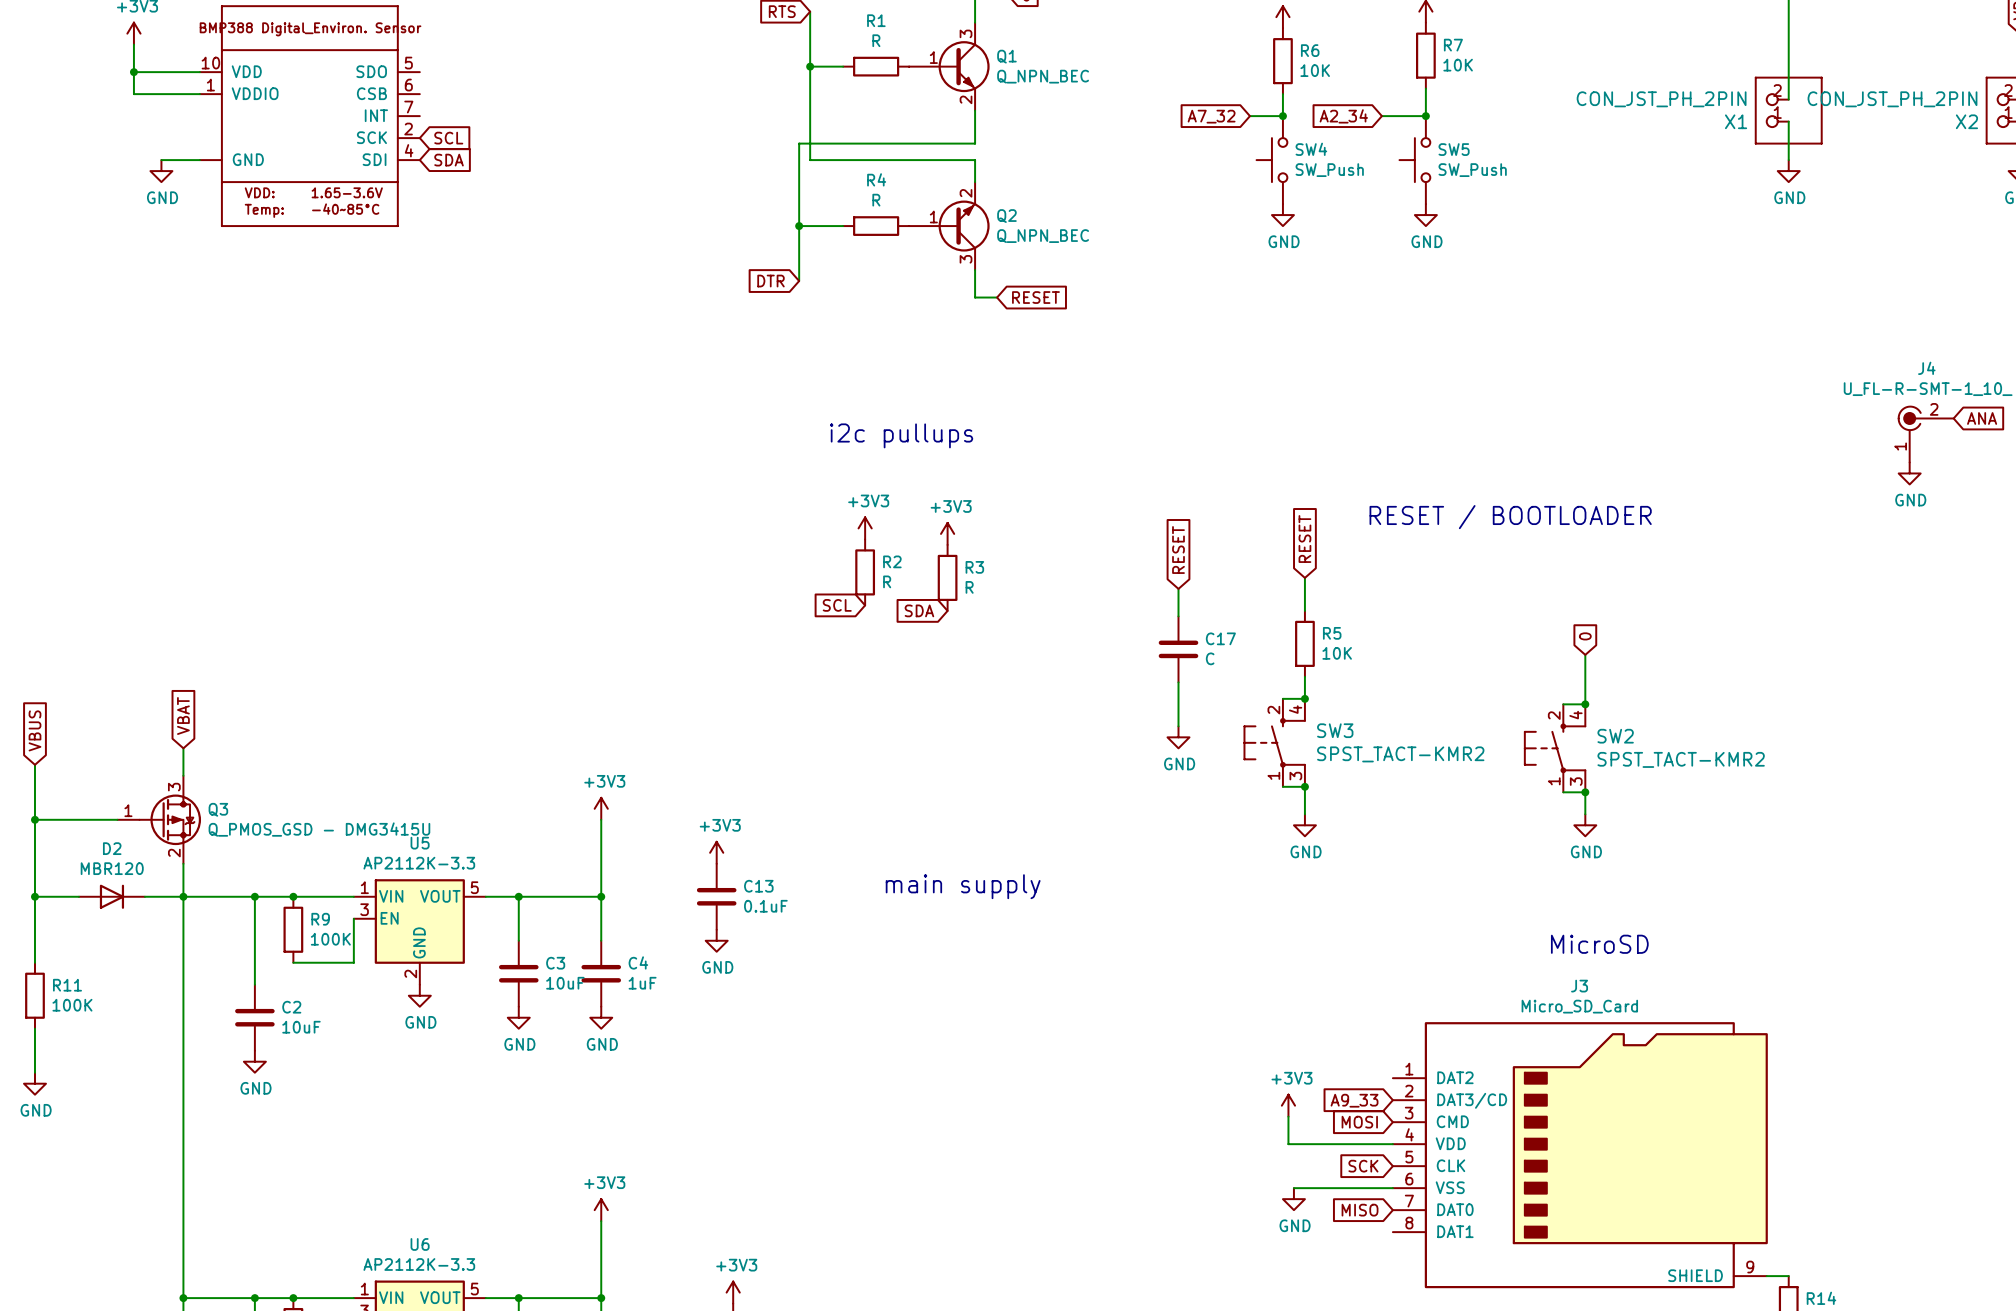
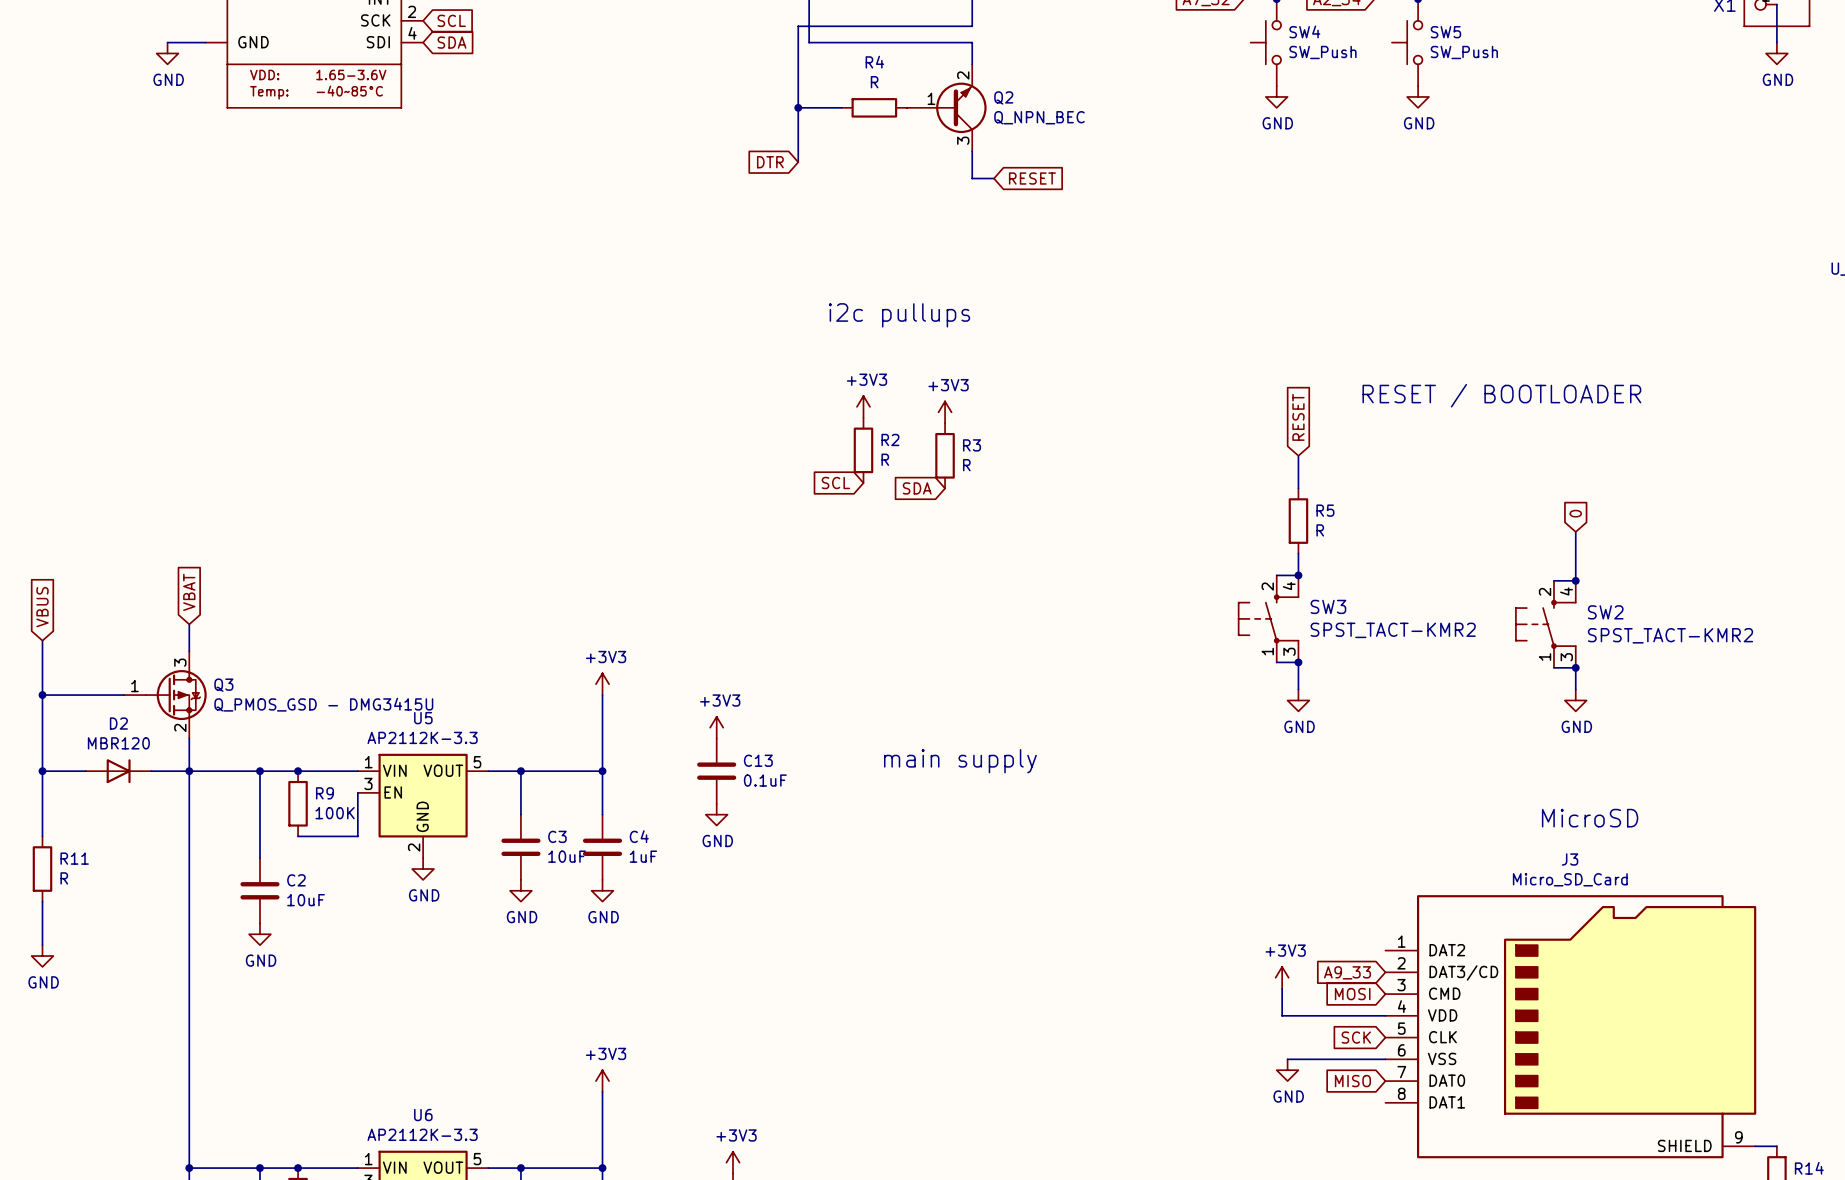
global label: RESET (1178, 550) -> none
wire: (1178, 588) (1178, 616) -> none
C17: C (1178, 649) -> none
R5 value: 10K (1337, 653) -> R (1320, 530)
wire: (1178, 682) (1178, 726) -> none
power symbol: GND (1178, 737) -> none
R11 value: 100K (72, 1005) -> R (64, 878)

